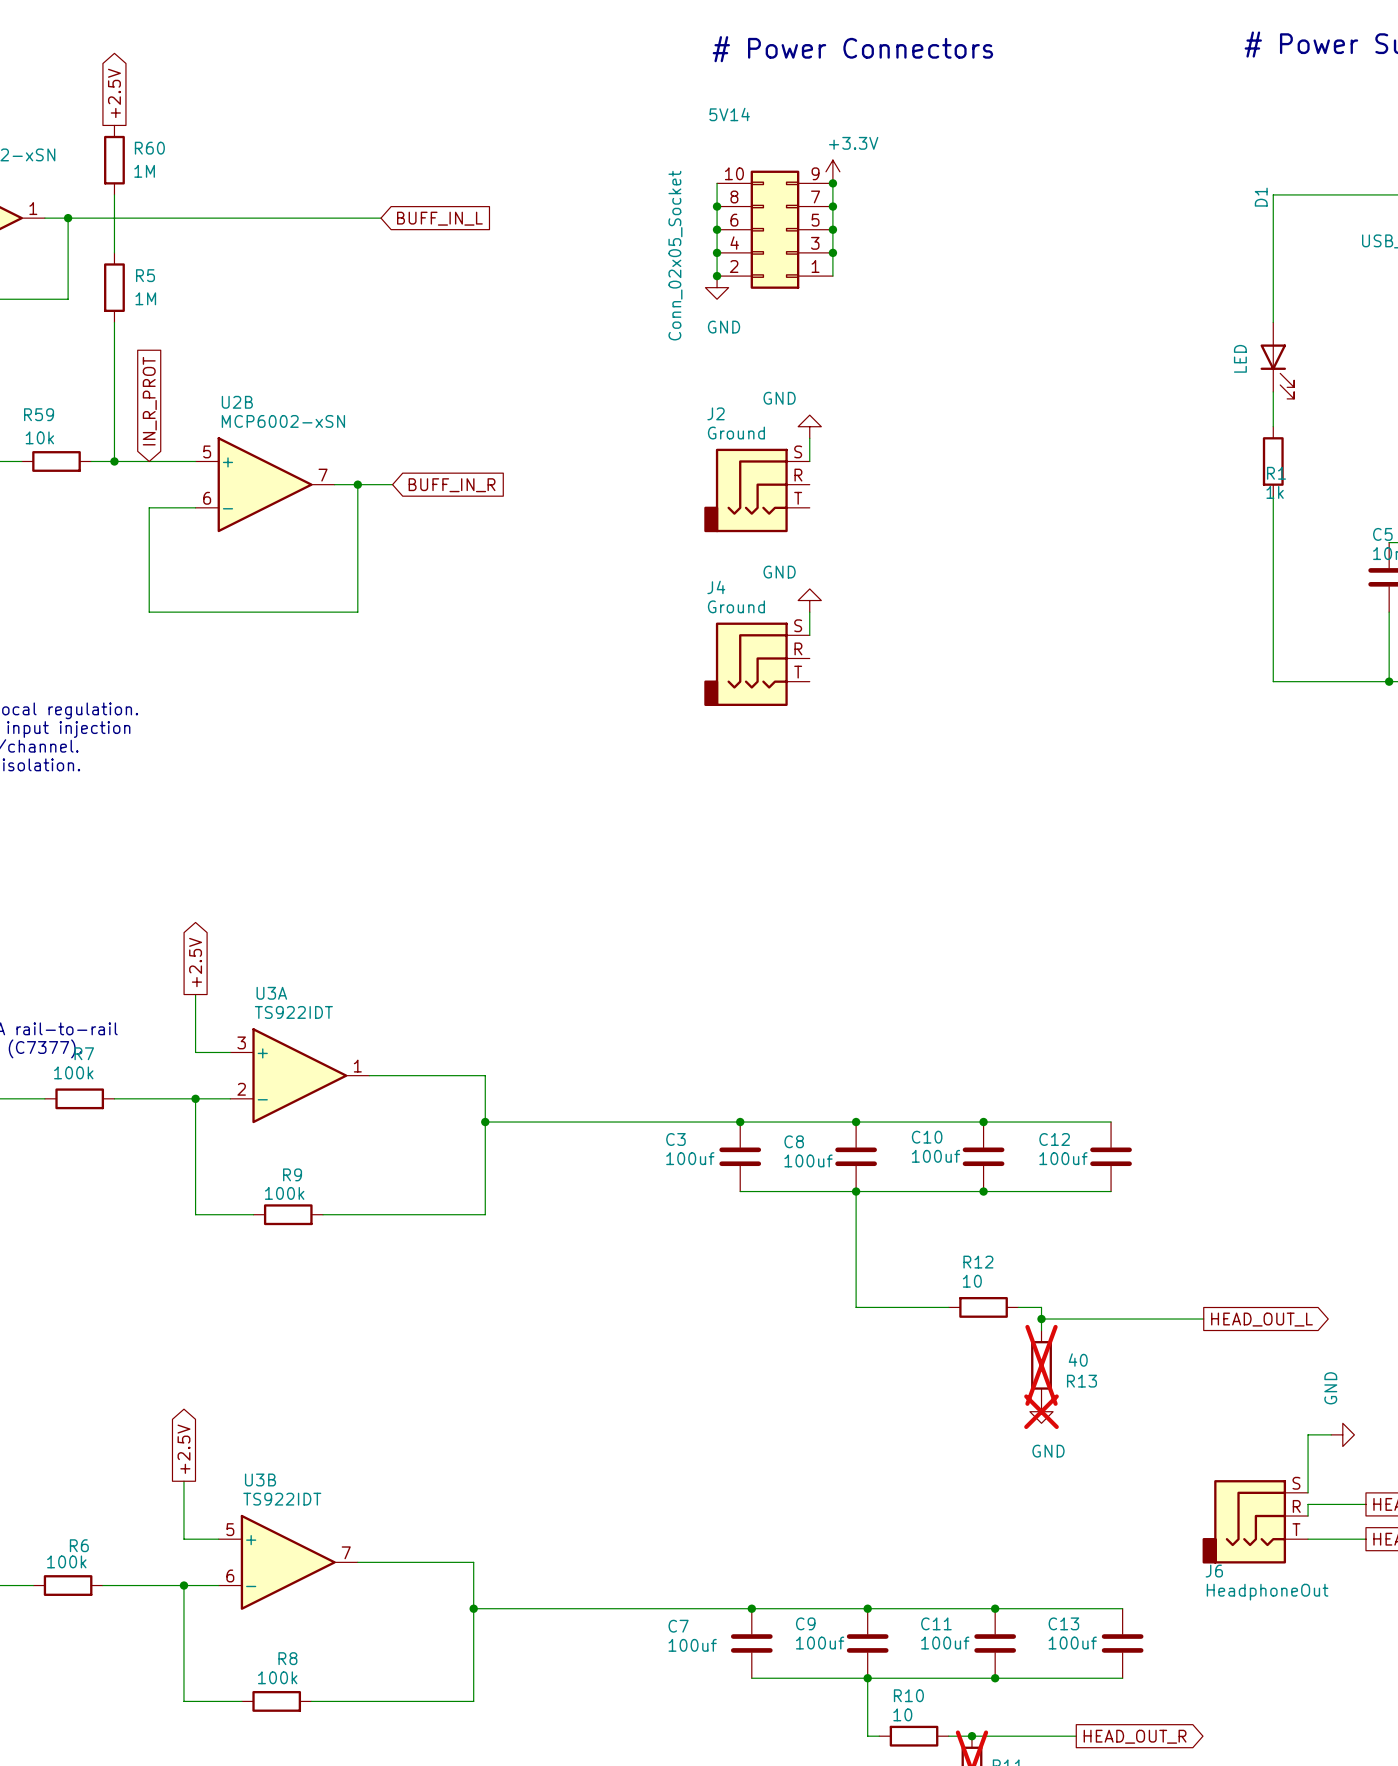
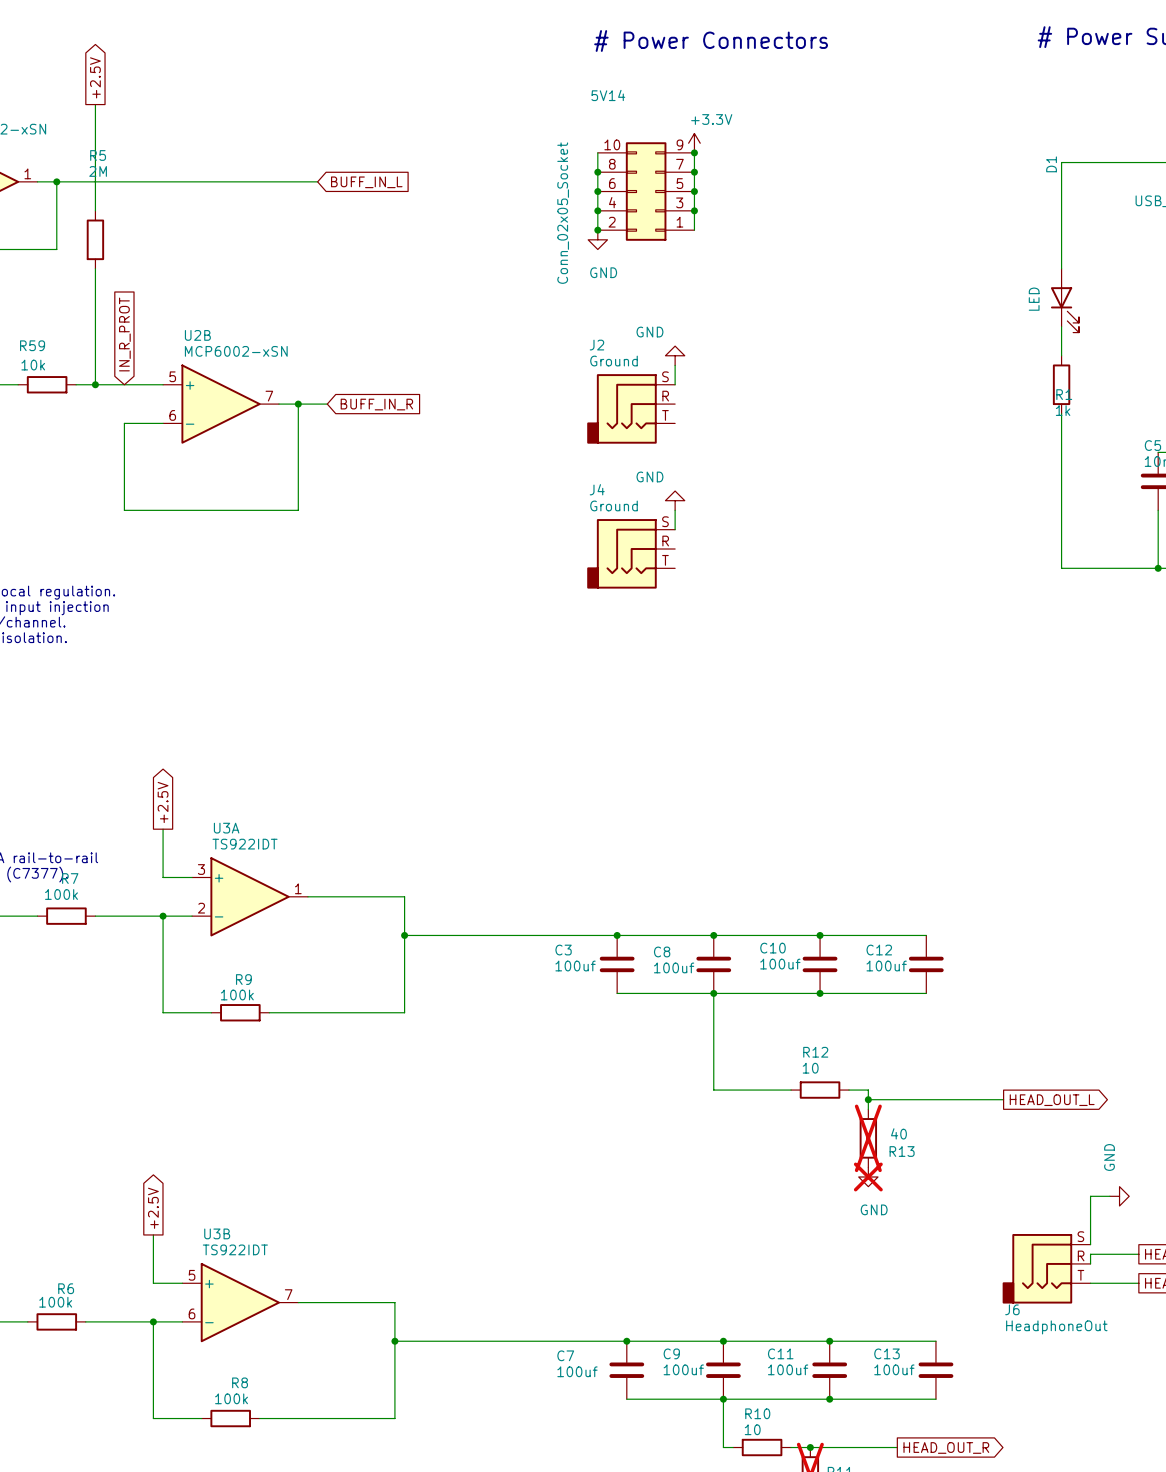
wire: none -> (95, 104) (95, 162)
R60: 1M (114, 160) -> none
R5 name position: R5 (145, 275) -> R5 (98, 155)
R5 value: 1M (145, 298) -> 2M (98, 171)

